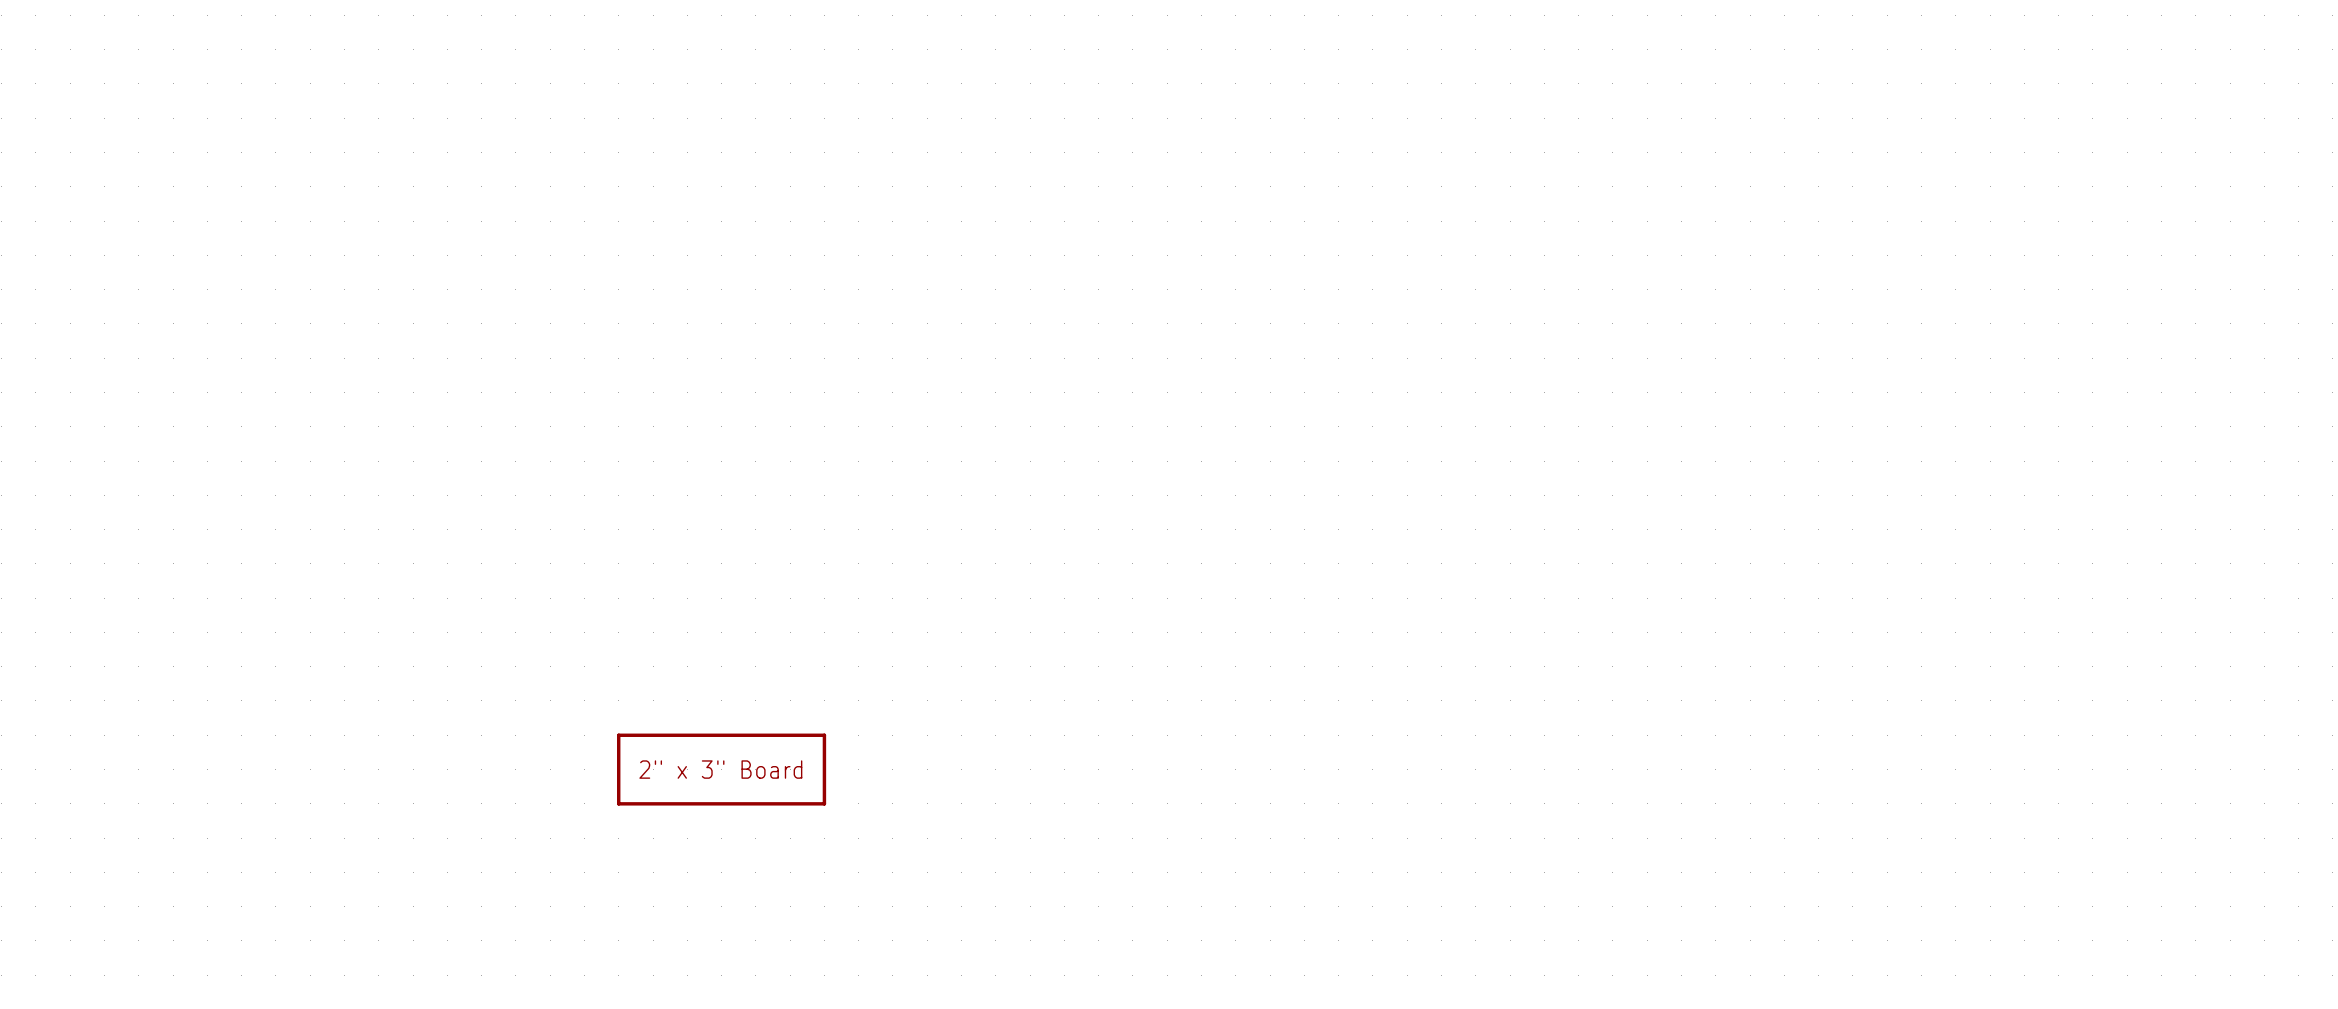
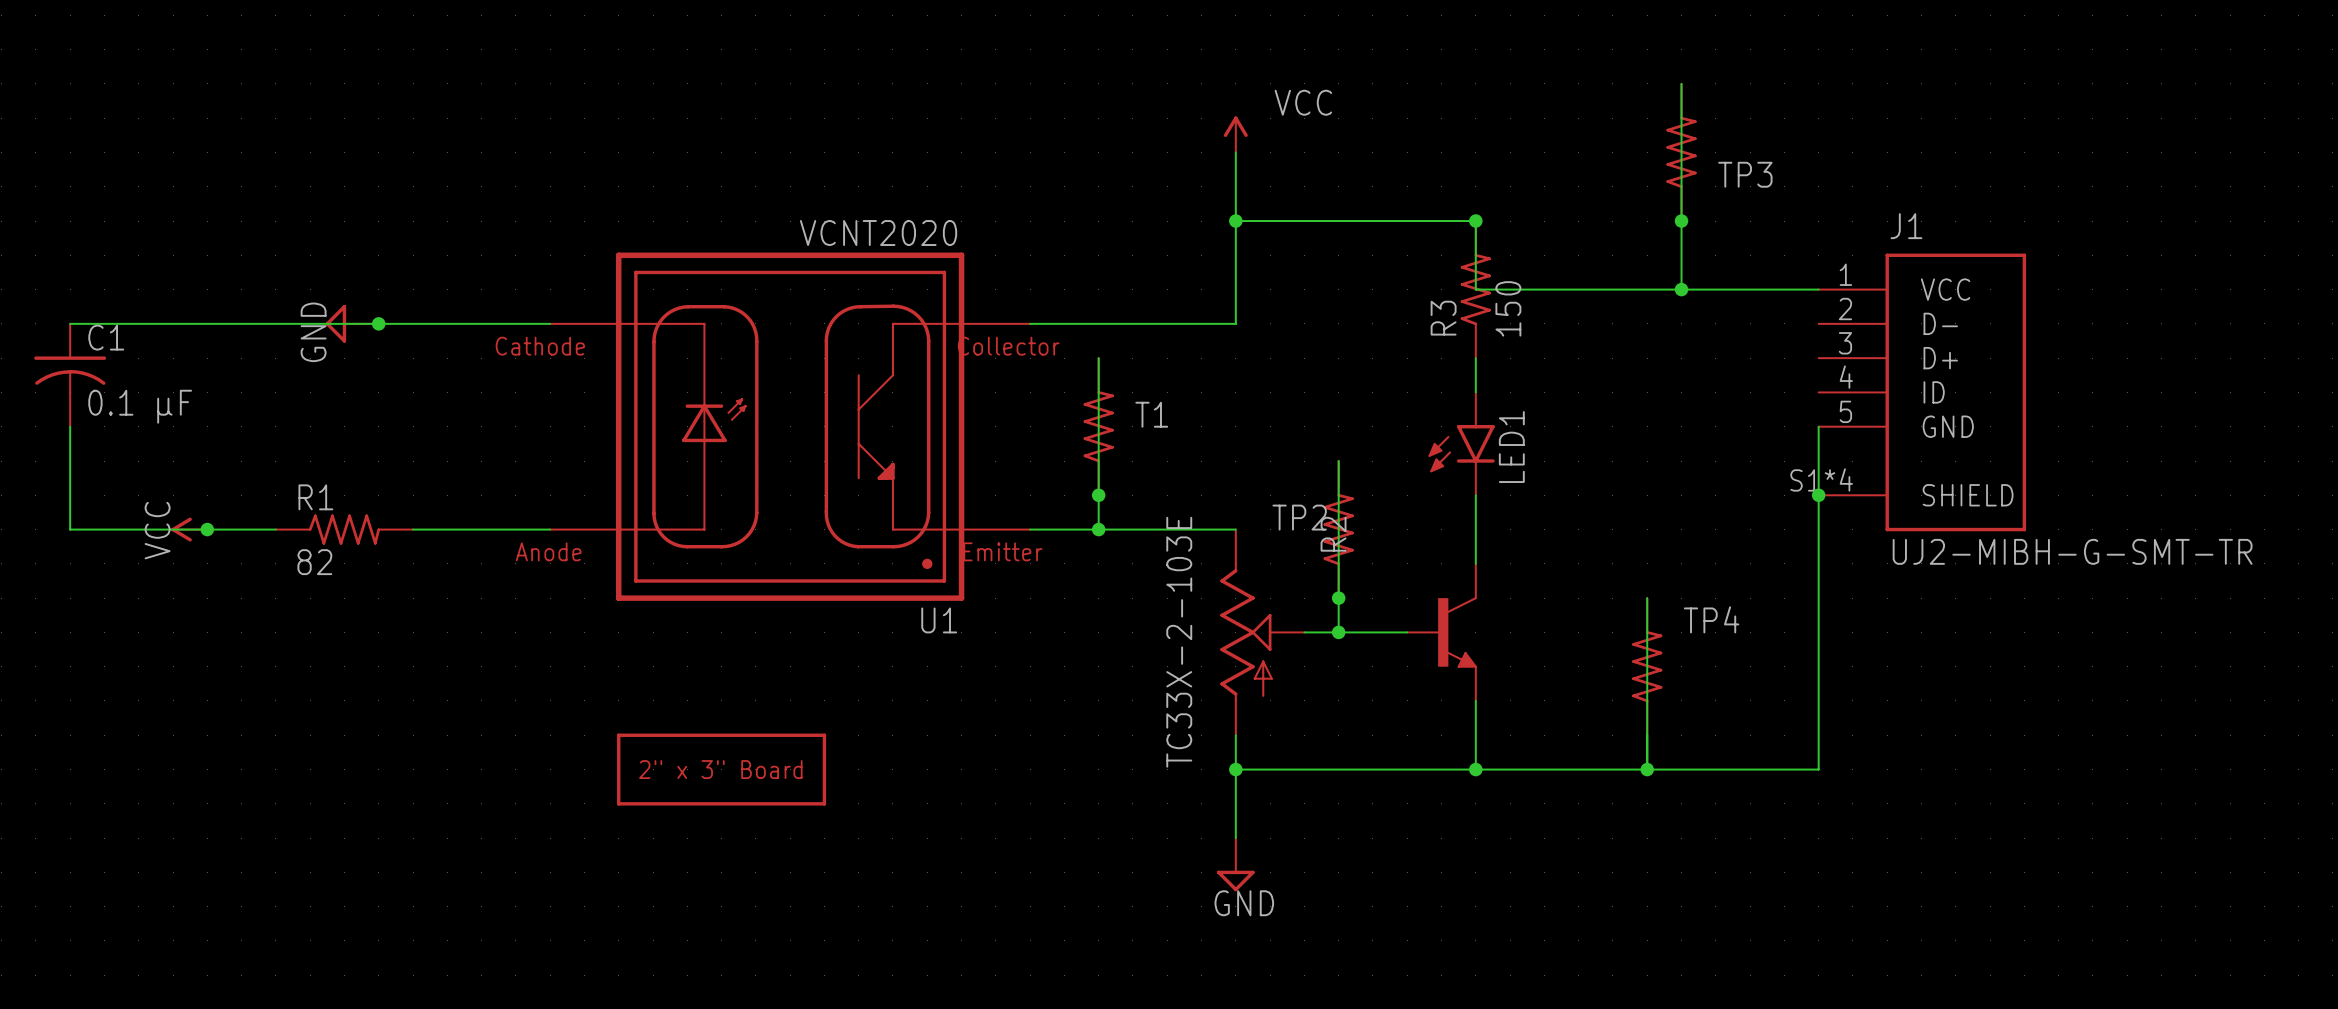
wire: none -> (1681, 83) (1681, 289)
power symbol: none -> VCC (1235, 134)
wire: none -> (1235, 152) (1235, 323) (1030, 323)
part: none -> (1681, 152)
label: none -> TP3 (1745, 174)
wire: none -> (1235, 221) (1475, 221) (1475, 289) (1818, 289)
junction: none -> (1235, 221)
junction: none -> (1475, 221)
junction: none -> (1681, 221)
R3: none -> 150 (1475, 289)
junction: none -> (1681, 289)
wire: none -> (70, 323) (550, 323)
power symbol: none -> GND (352, 323)
junction: none -> (378, 323)
wire: none -> (1098, 358) (1098, 529)
wire: none -> (1475, 358) (1475, 392)
C1: none -> 0.1 µF (70, 375)
J1: none -> UJ2-MIBH-G-SMT-TR (1922, 392)
wire: none -> (70, 426) (70, 529) (275, 529)
U1: none -> VCNT2020 (790, 426)
part: none -> (1098, 426)
wire: none -> (1818, 426) (1818, 769) (1235, 769)
LED1: none -> (1461, 443)
wire: none -> (1338, 461) (1338, 632)
junction: none -> (1098, 495)
wire: none -> (1475, 495) (1475, 563)
junction: none -> (1818, 495)
label: none -> TP2 (1299, 517)
power symbol: none -> VCC (189, 529)
junction: none -> (207, 529)
R1: none -> 82 (344, 529)
wire: none -> (413, 529) (550, 529)
wire: none -> (1030, 529) (1235, 529)
junction: none -> (1098, 529)
part: none -> (1338, 529)
junction: none -> (1338, 598)
wire: none -> (1647, 598) (1647, 769)
label: none -> TP4 (1711, 619)
R2: none -> TC33X-2-103E (1262, 632)
wire: none -> (1304, 632) (1407, 632)
junction: none -> (1338, 632)
T1: none -> (1442, 632)
part: none -> (1647, 666)
wire: none -> (1475, 700) (1475, 769)
wire: none -> (1235, 735) (1235, 838)
junction: none -> (1235, 769)
junction: none -> (1475, 769)
junction: none -> (1647, 769)
power symbol: none -> GND (1235, 864)

